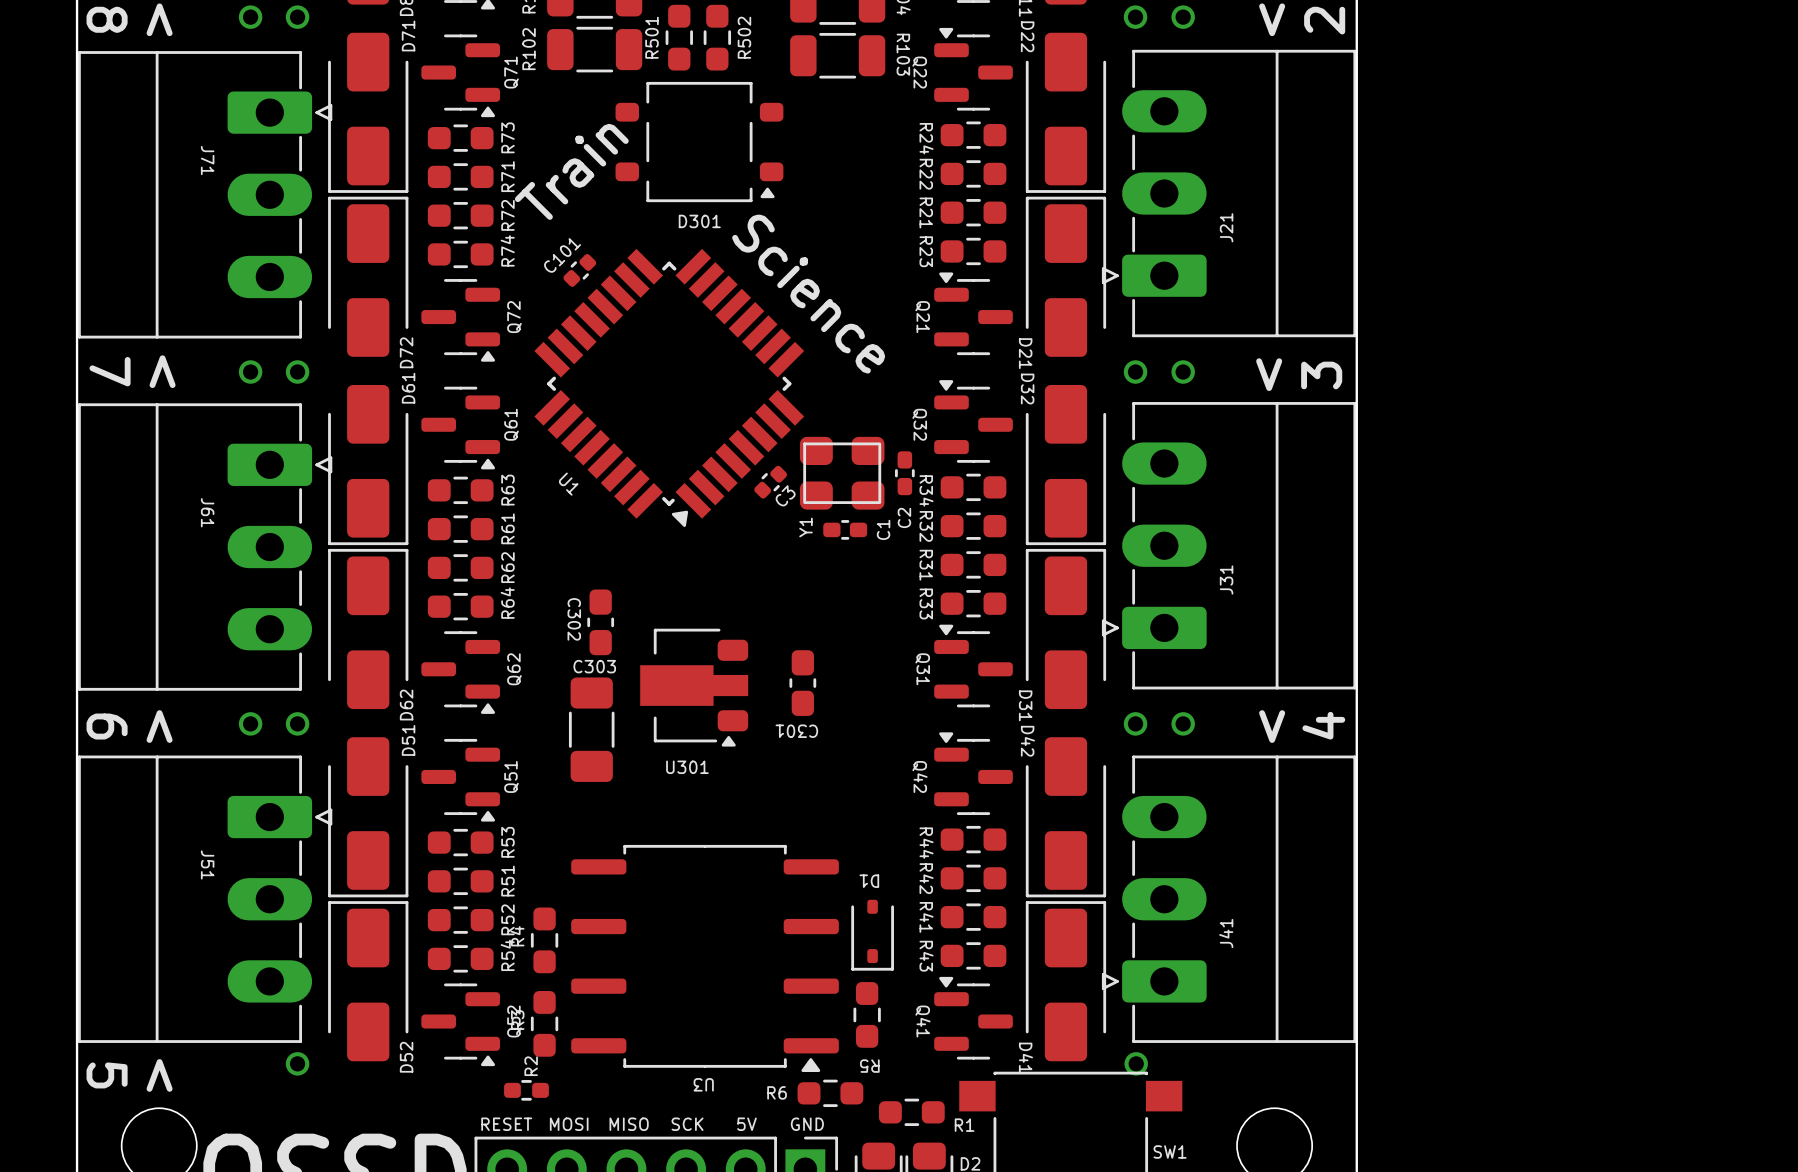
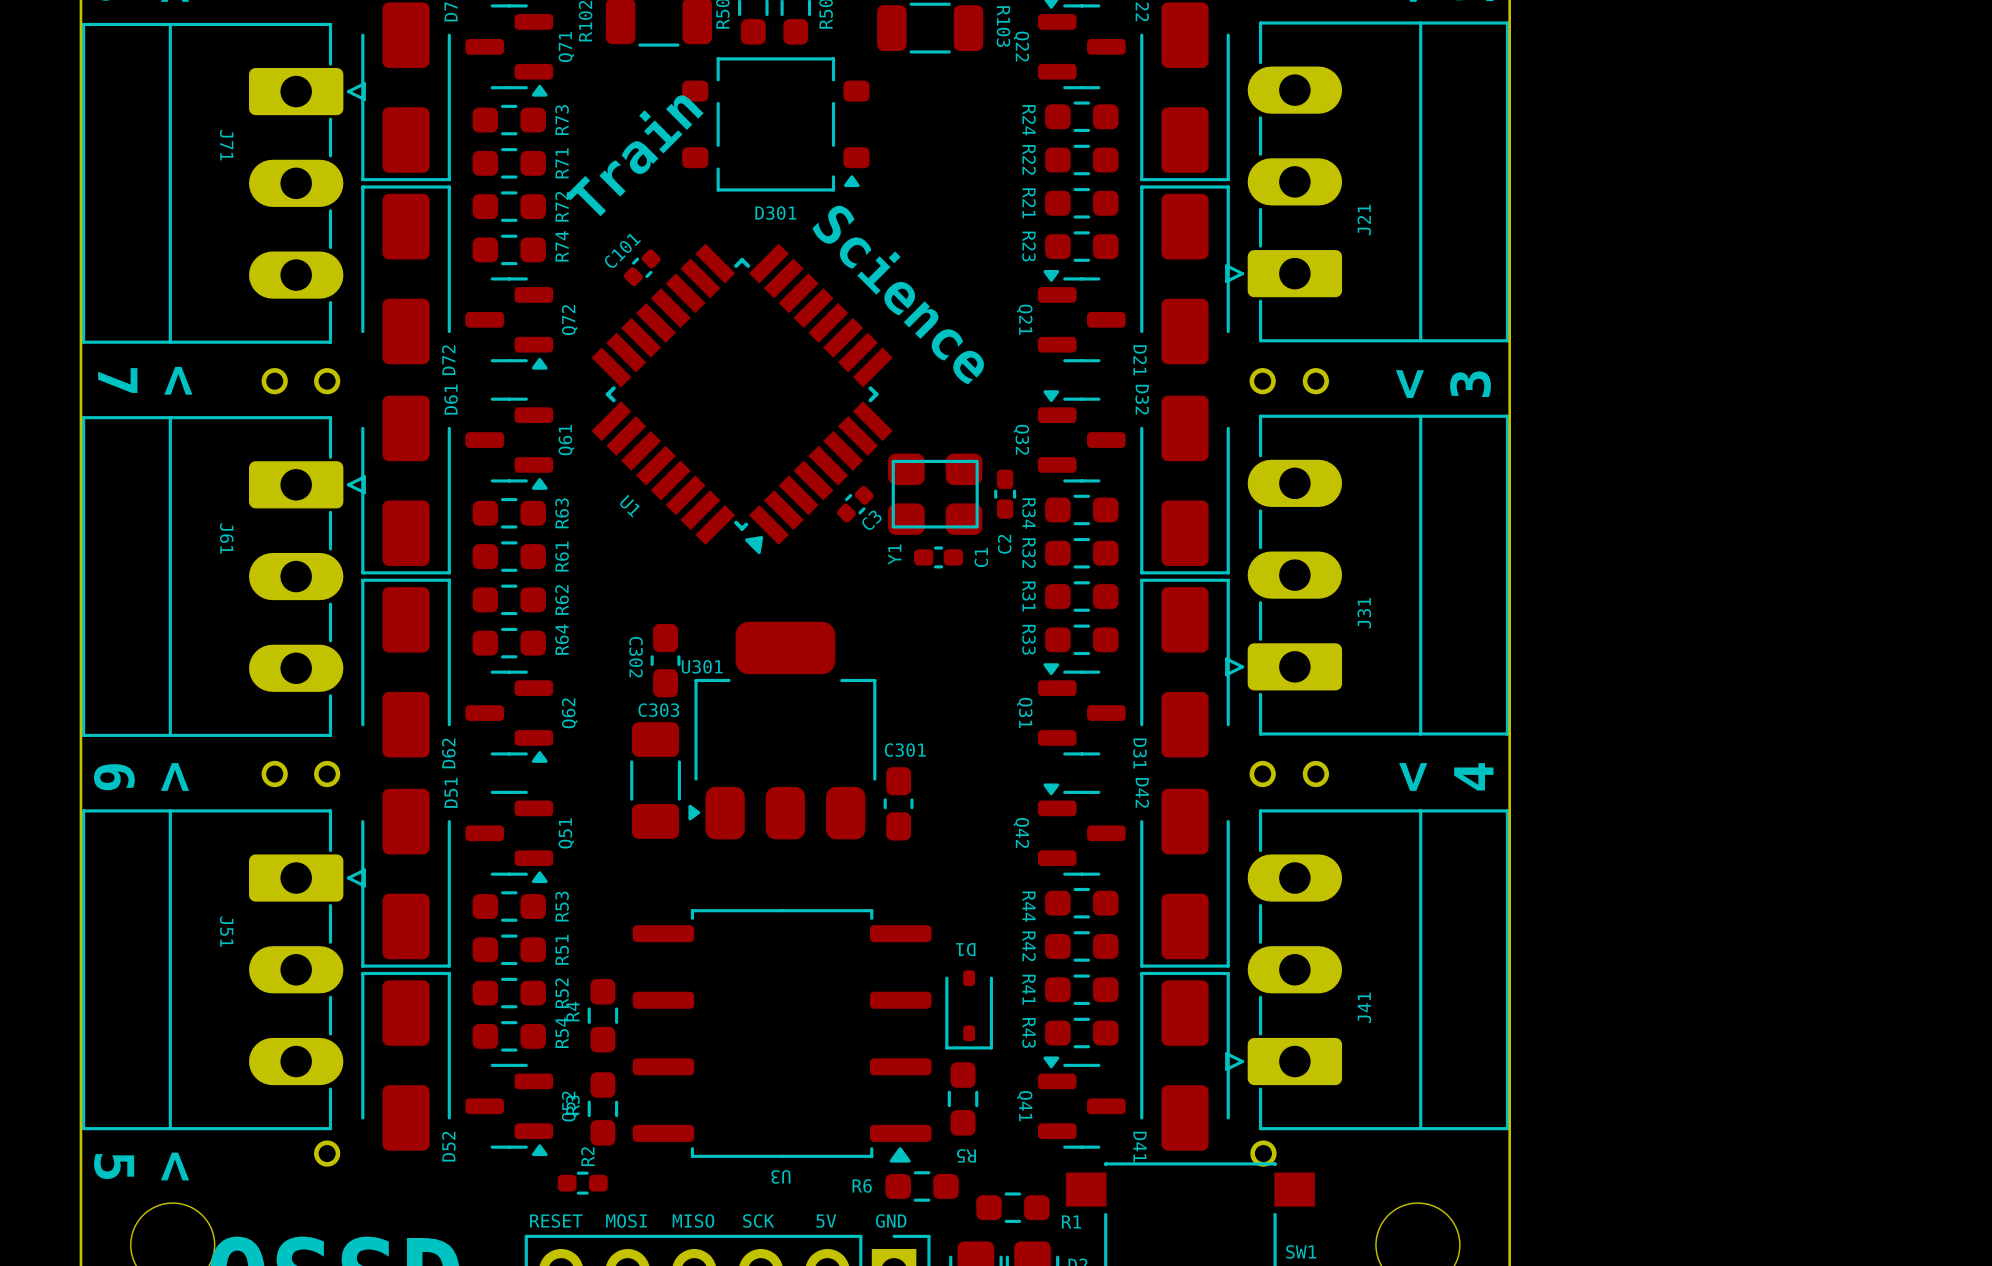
U301 footprint: [640, 628, 749, 747] -> [688, 621, 877, 840]
C301 position: (802, 683) -> (898, 803)
C301 name rotation: 0° (796, 731) -> 180° (905, 750)
U301 name position: U301 (687, 767) -> U301 (702, 666)

